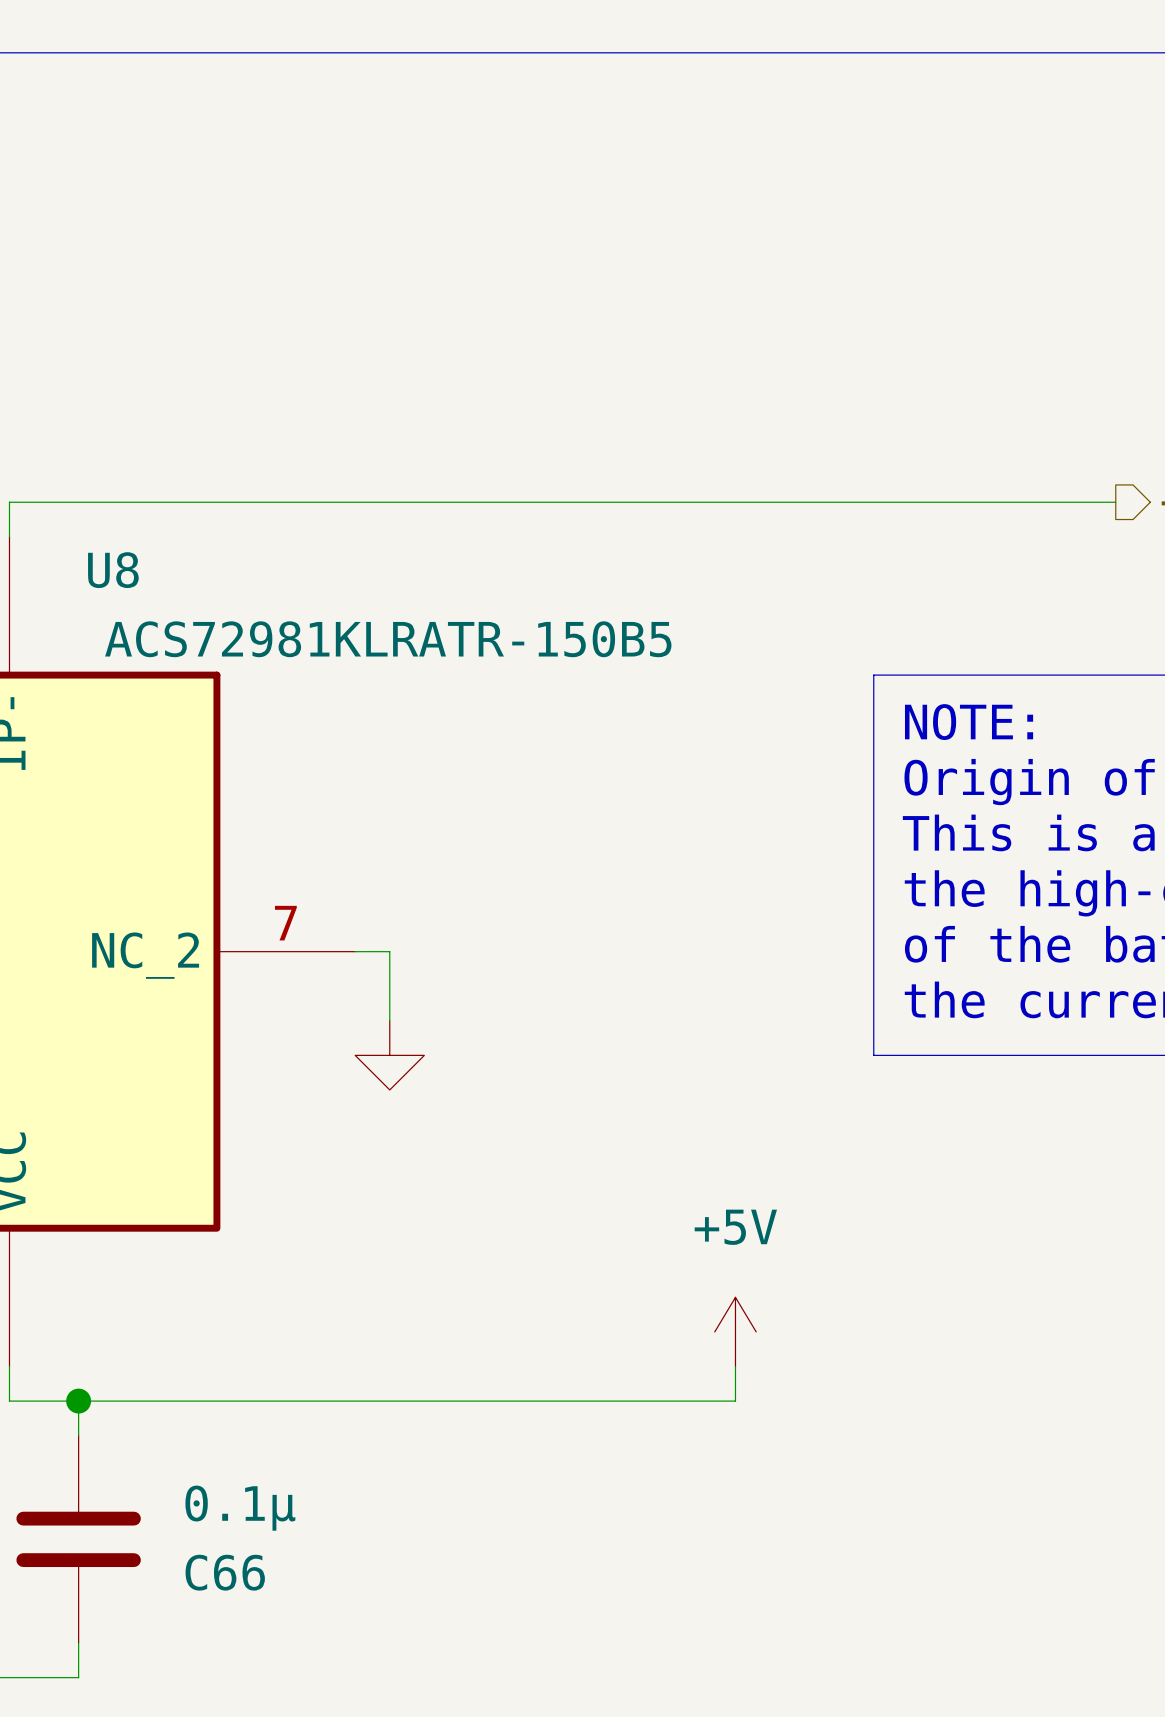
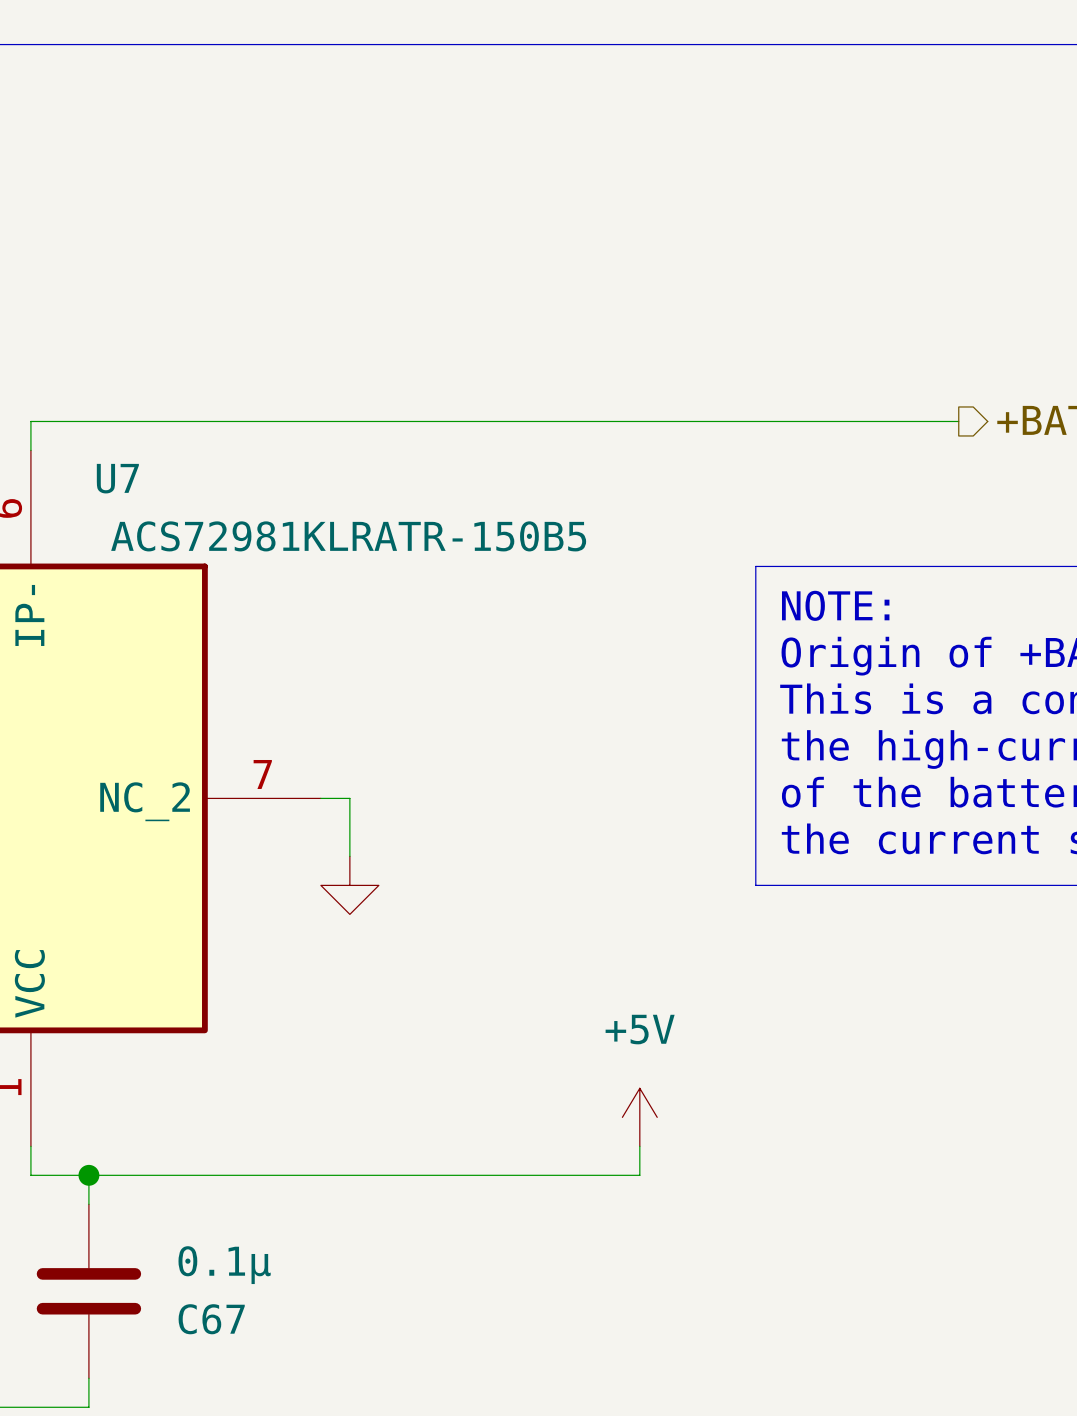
U8 name: U8 (113, 570) -> U7 (117, 478)
C66 name: C66 (225, 1572) -> C67 (211, 1319)

